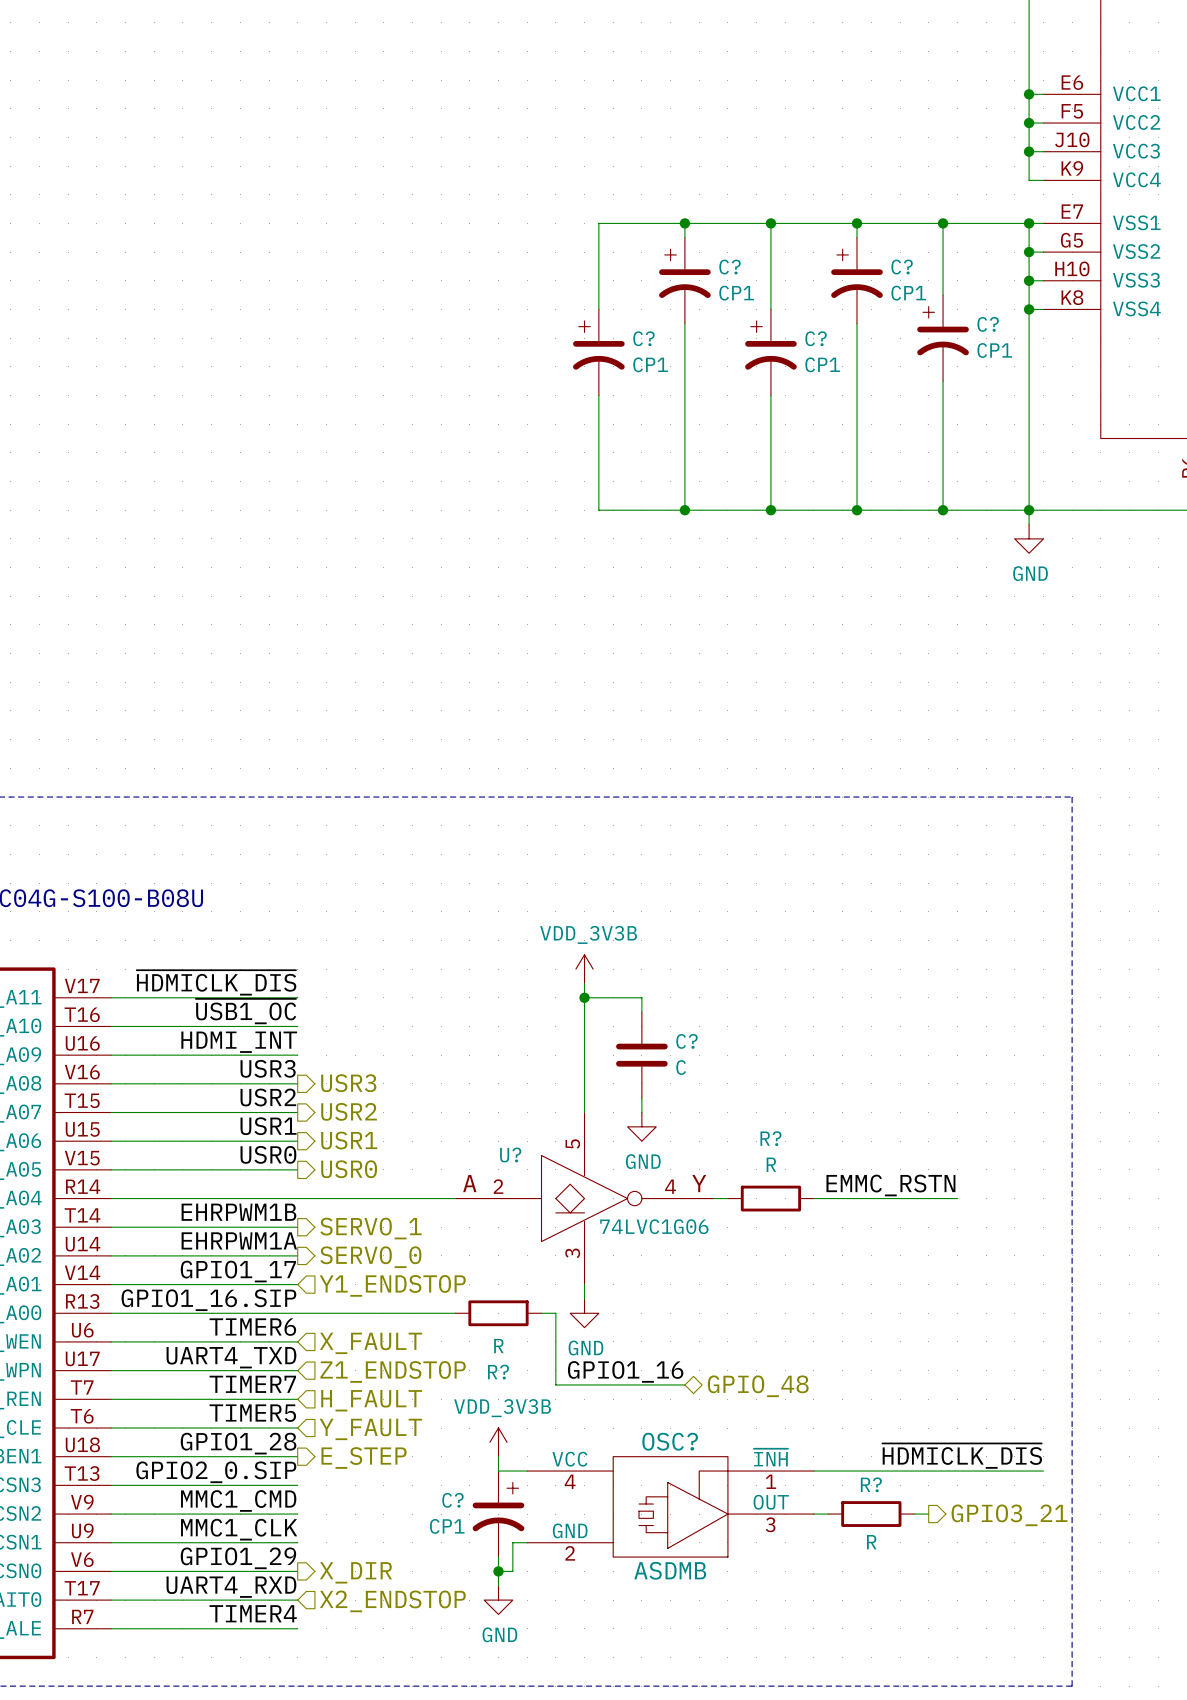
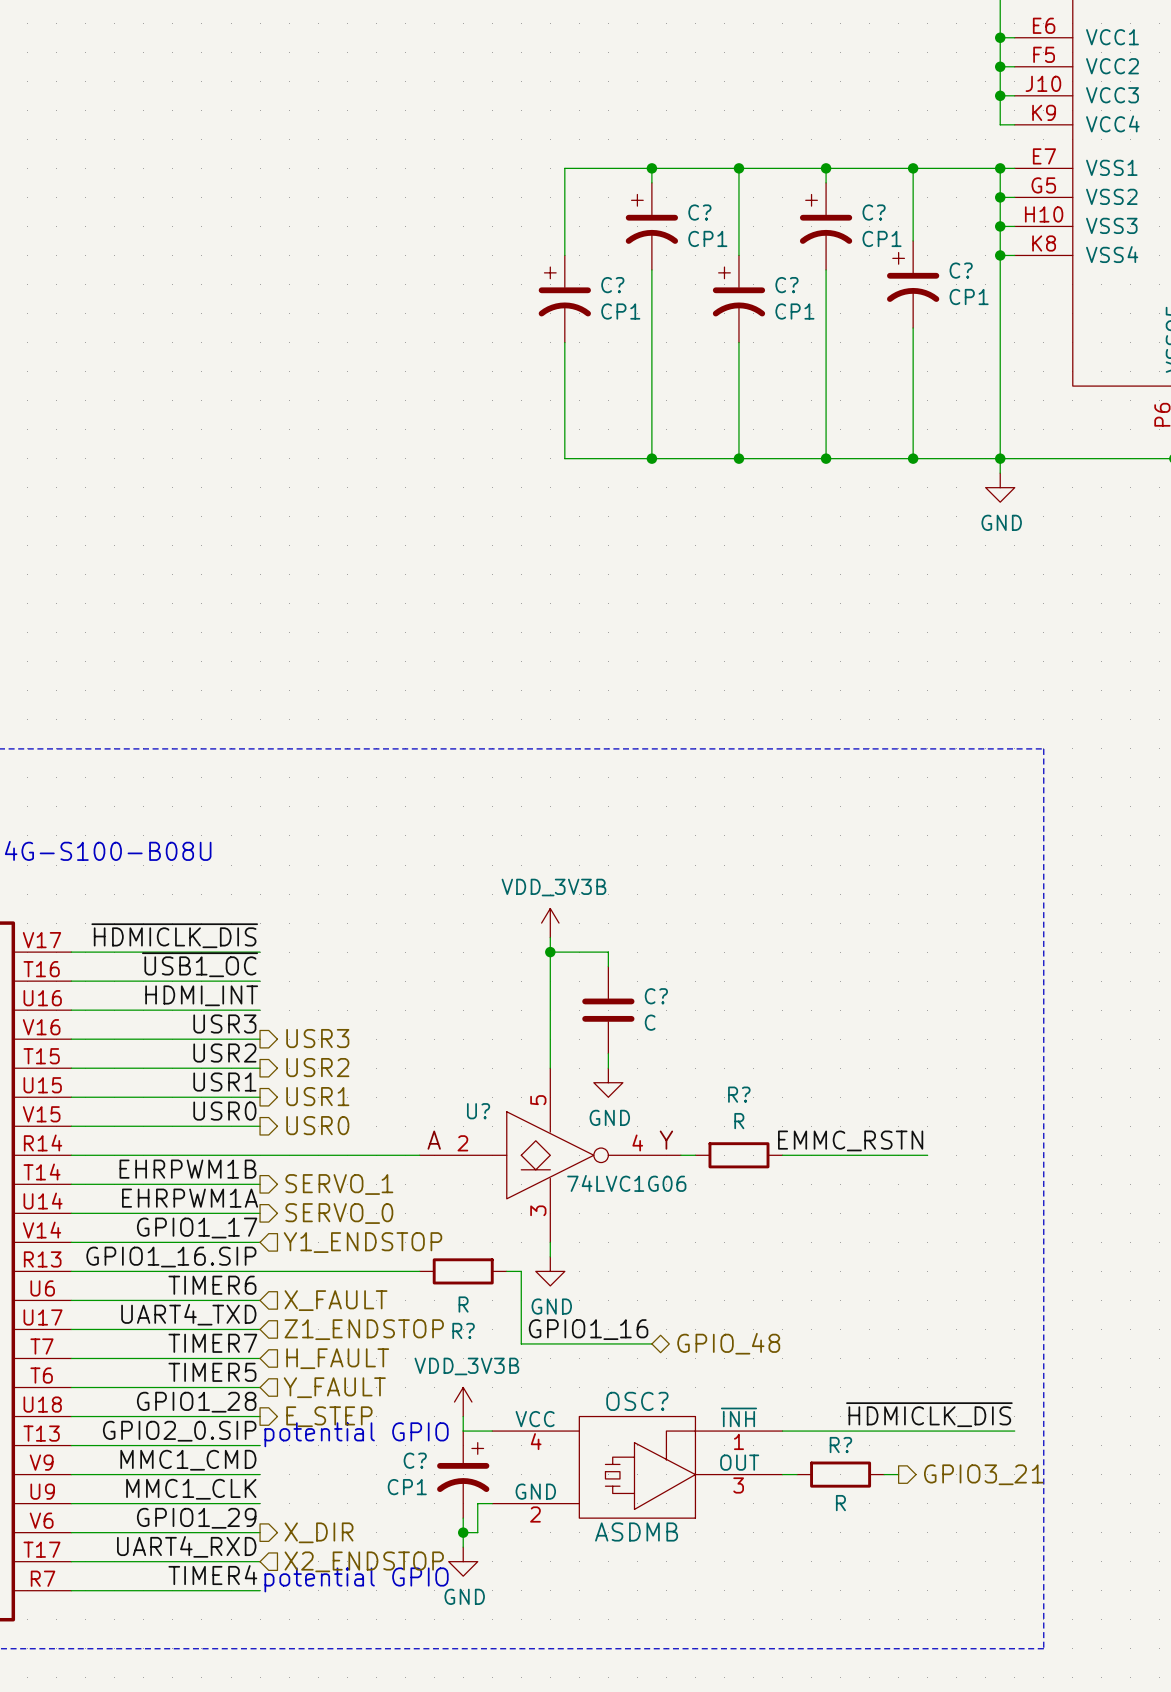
text: none -> potential GPIO (356, 1434)
text: none -> potential GPIO (356, 1579)

